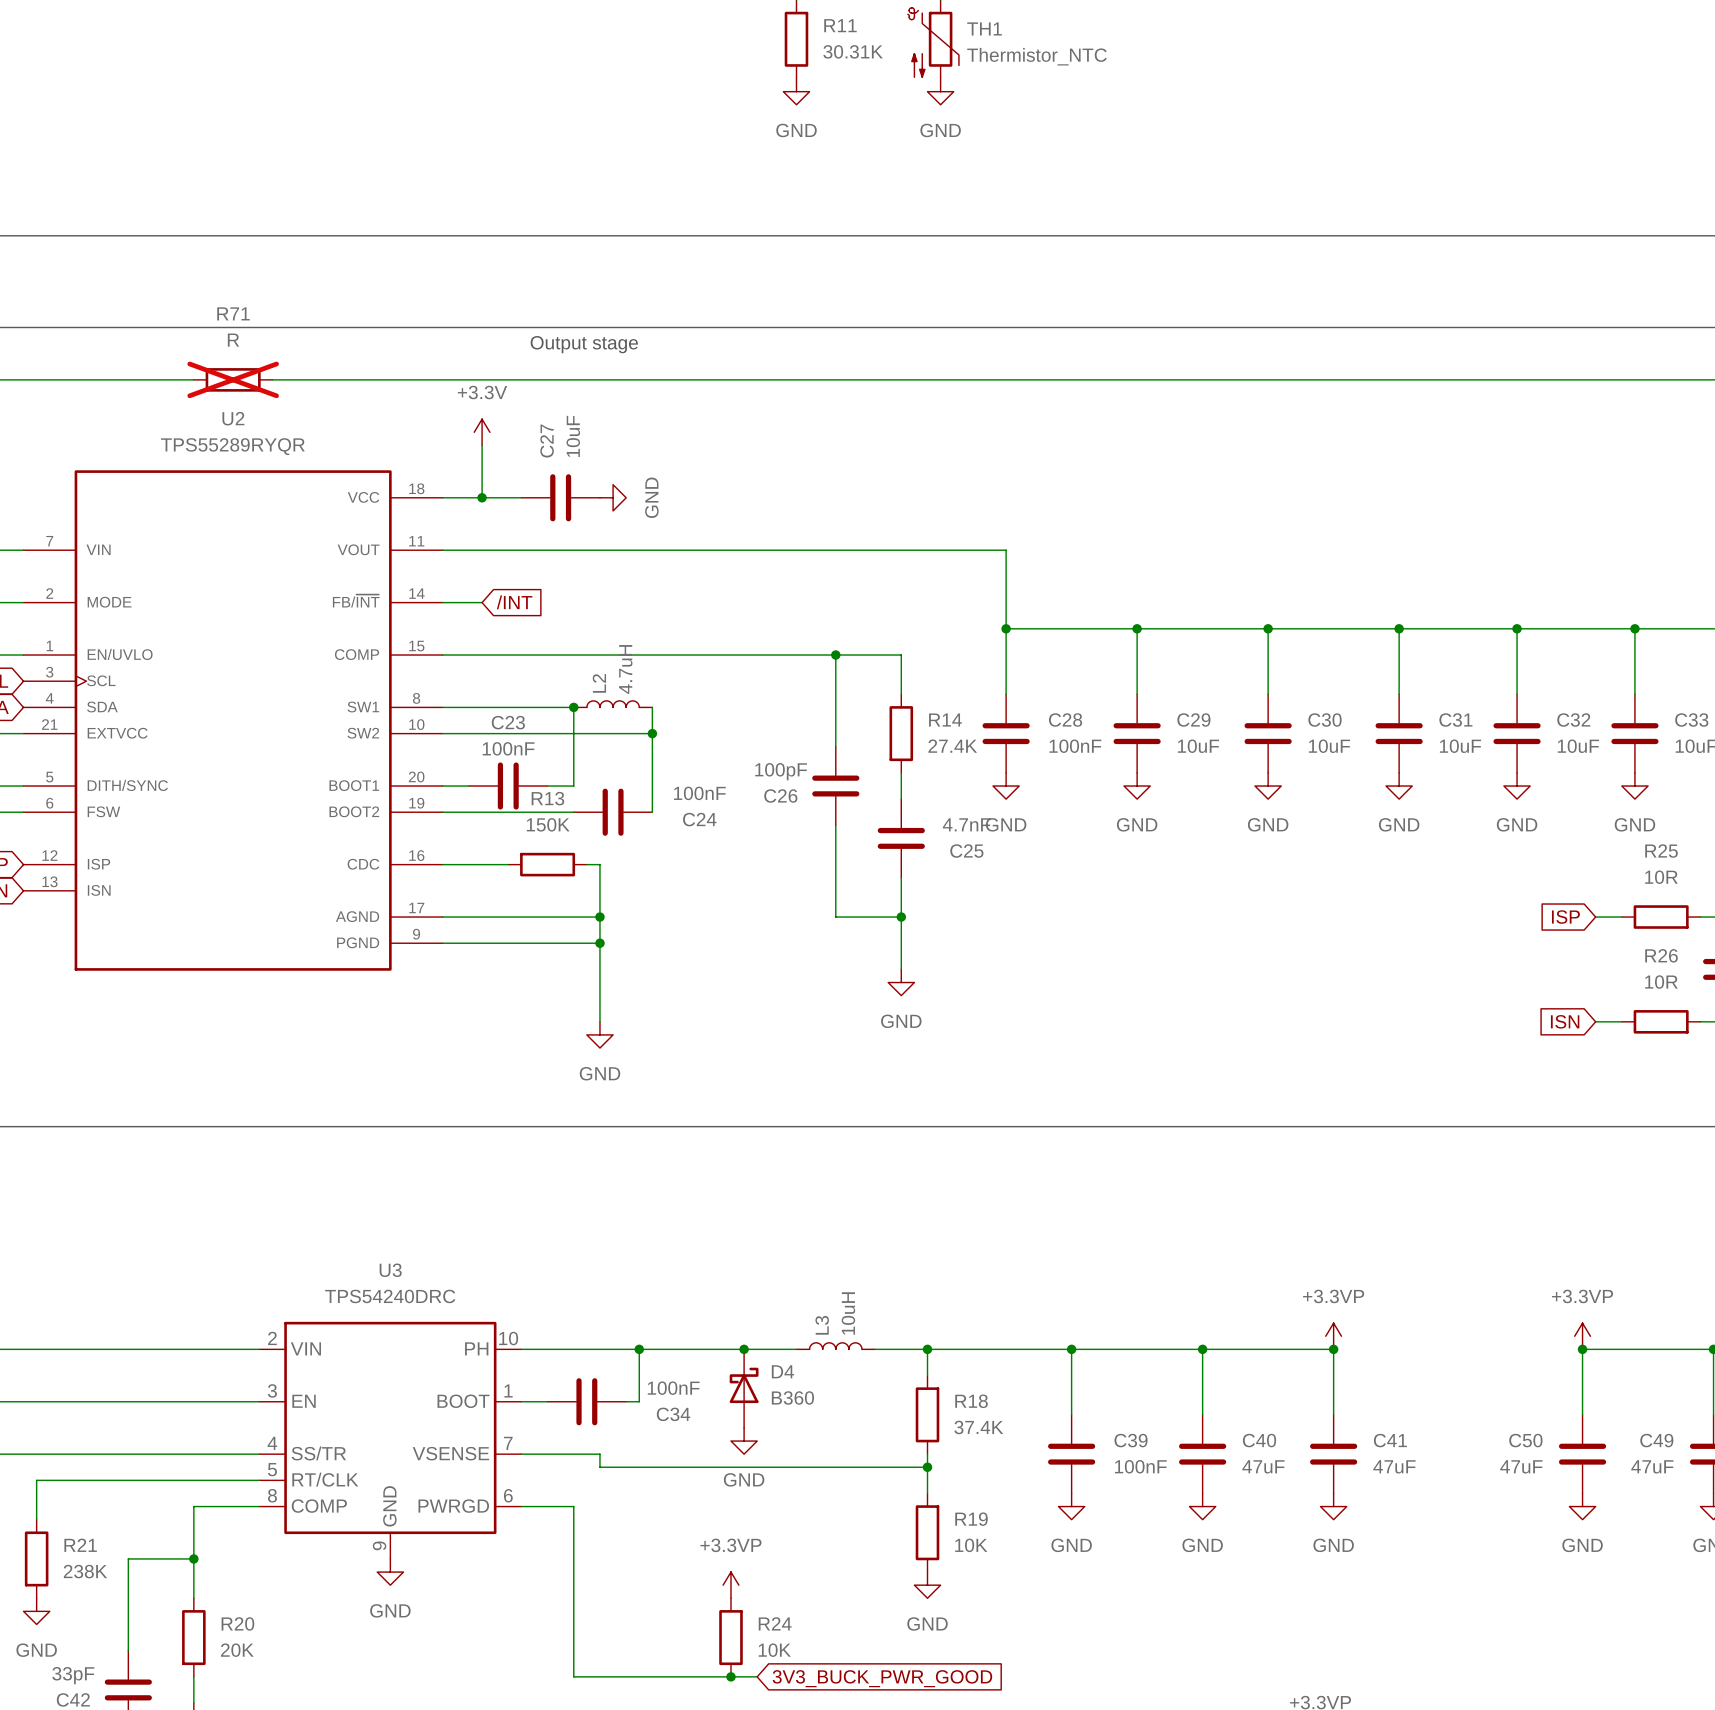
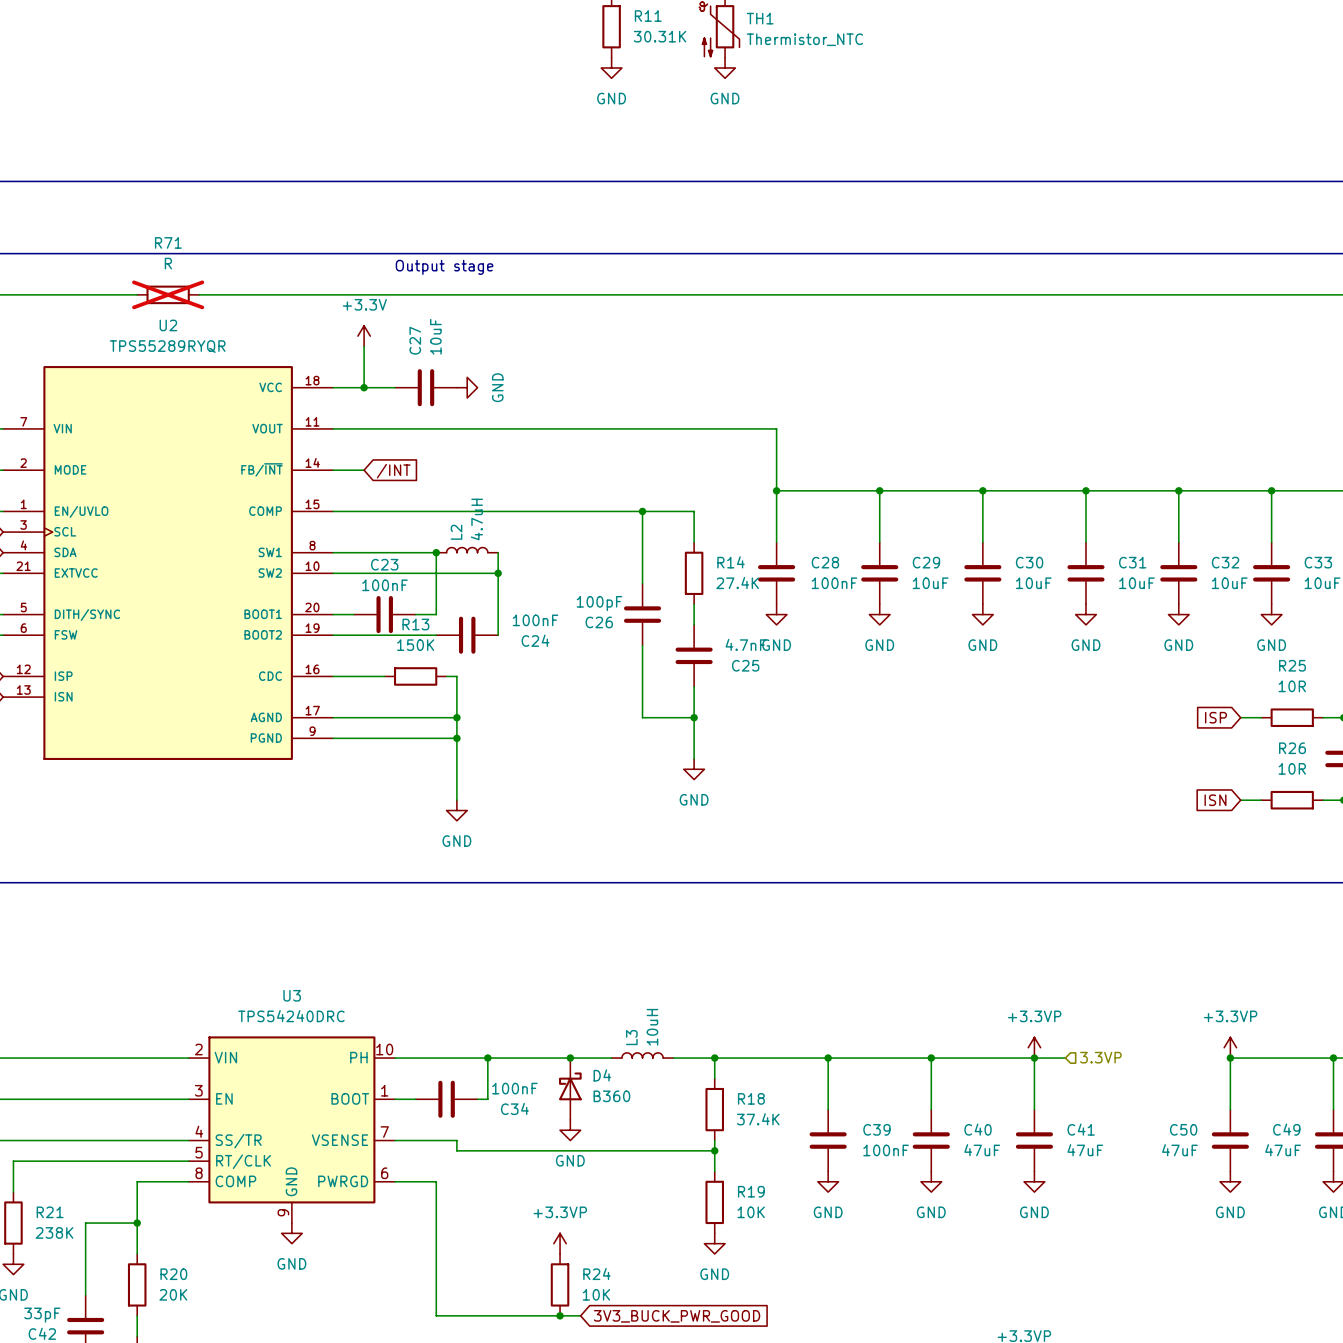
hierarchical label: none -> 3.3VP (1100, 1057)
wire: none -> (1034, 1058) (1065, 1058)

